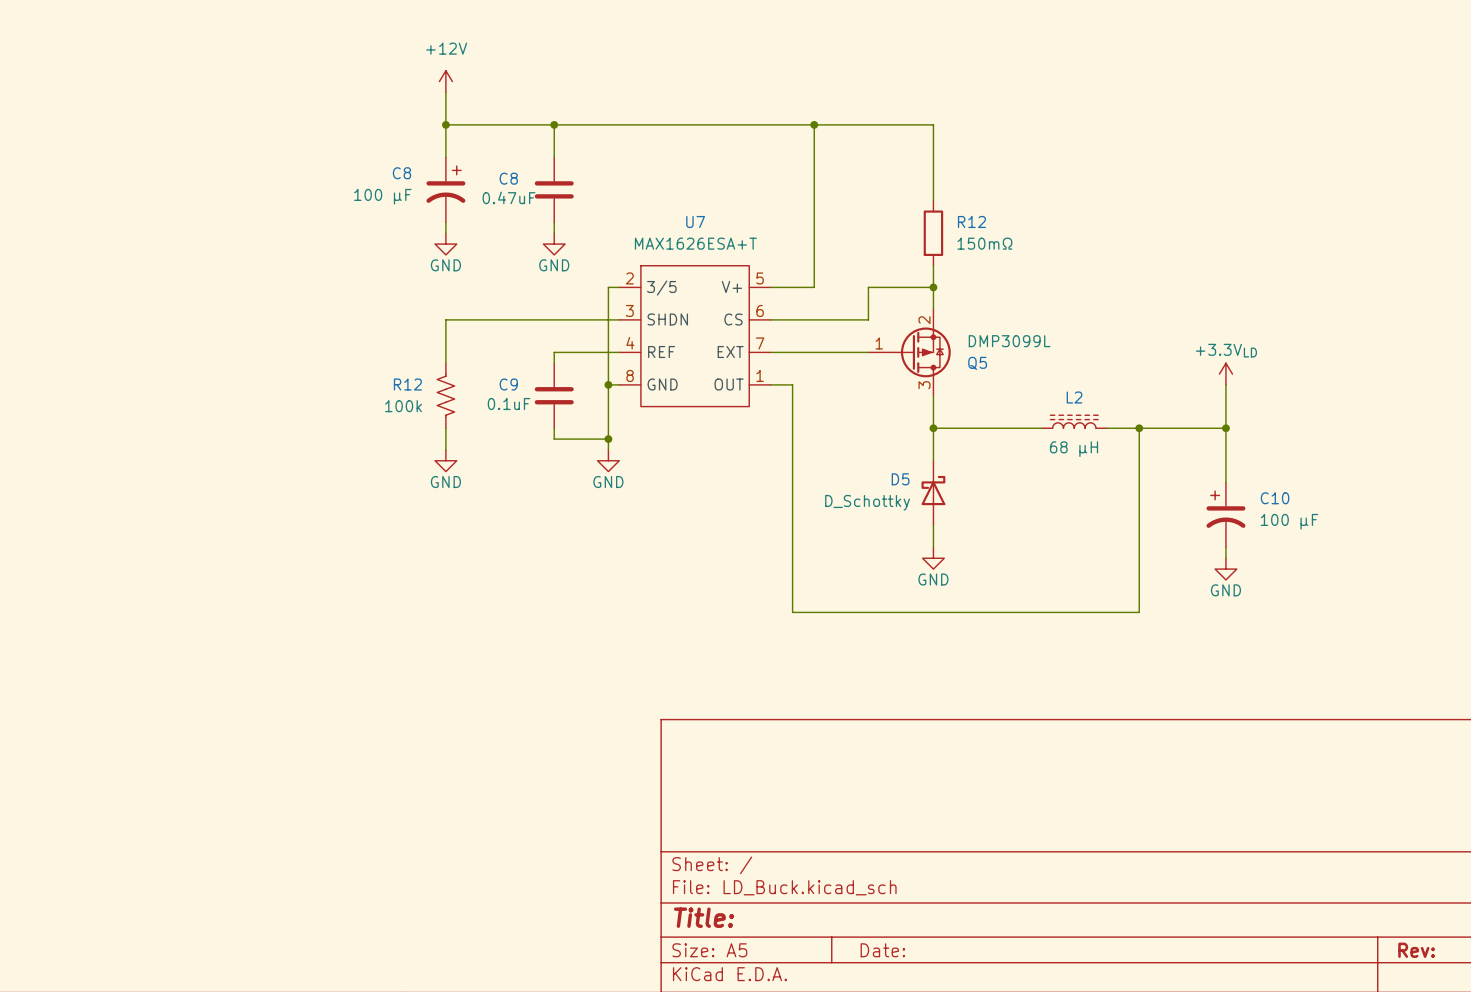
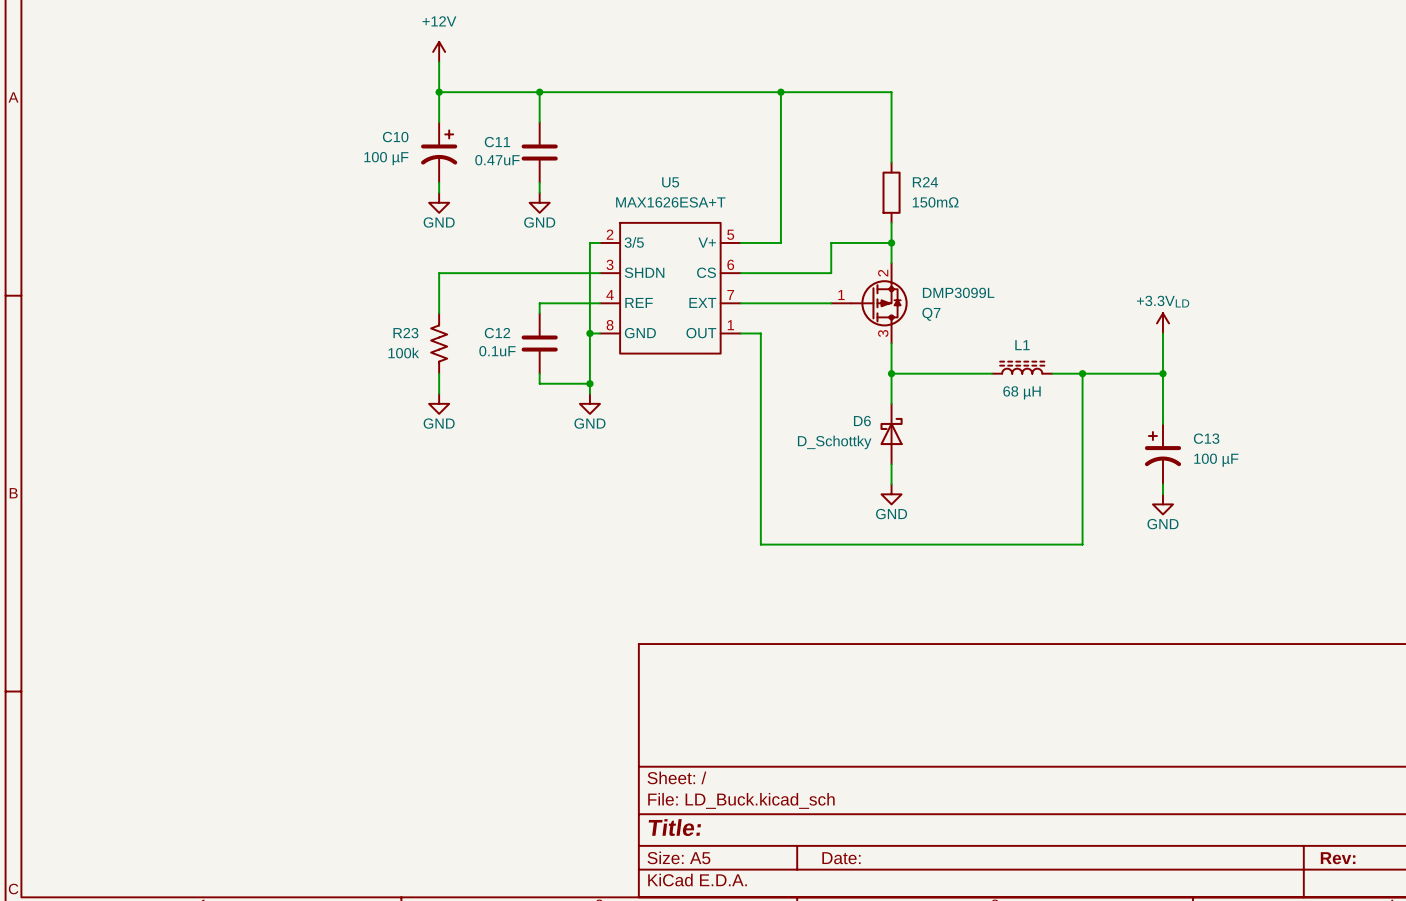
C8 name: C8 (401, 173) -> C10 (395, 137)
C8 name: C8 (508, 178) -> C11 (497, 142)
U7 name: U7 (695, 221) -> U5 (670, 182)
R12 name: R12 (971, 221) -> R24 (925, 182)
Q5 name: Q5 (977, 363) -> Q7 (931, 314)
R12 name: R12 (407, 384) -> R23 (405, 333)
C9 name: C9 (508, 384) -> C12 (497, 333)
L2 name: L2 (1074, 397) -> L1 (1022, 345)
D5 name: D5 (900, 479) -> D6 (862, 421)
C10 name: C10 (1275, 498) -> C13 (1206, 438)

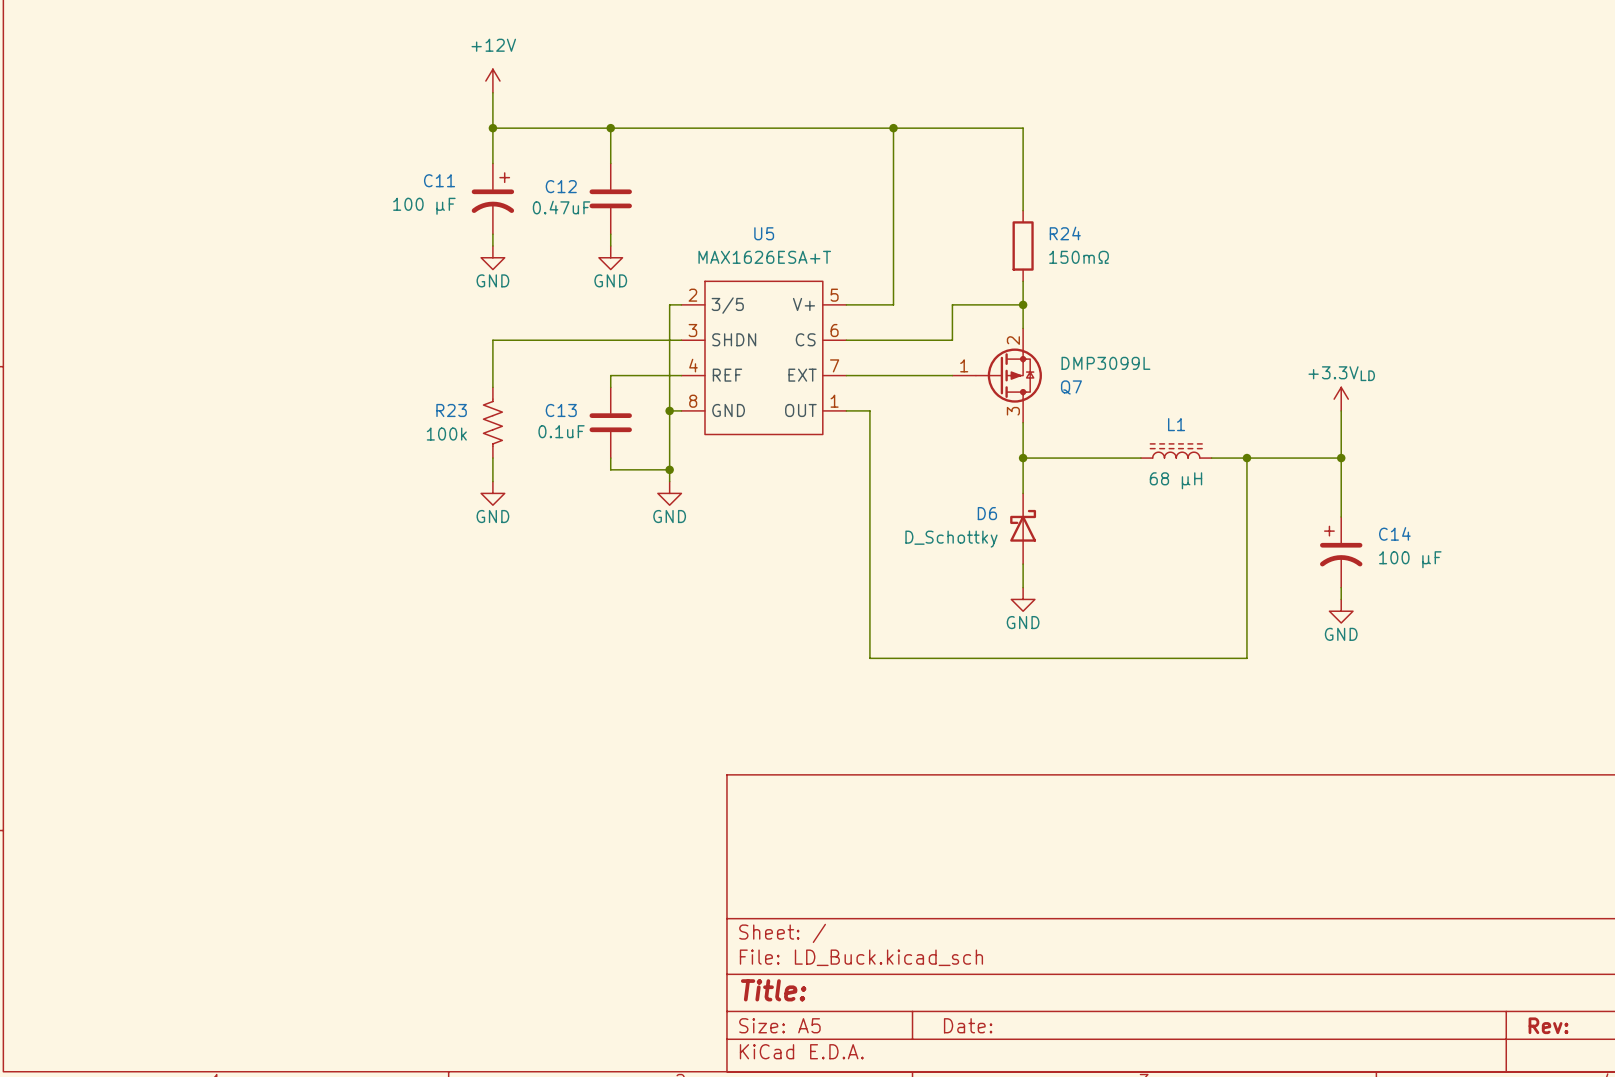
C10 name: C10 (395, 137) -> C11 (439, 180)
C11 name: C11 (497, 142) -> C12 (561, 186)
C12 name: C12 (497, 333) -> C13 (561, 410)
C13 name: C13 (1206, 438) -> C14 (1394, 533)

